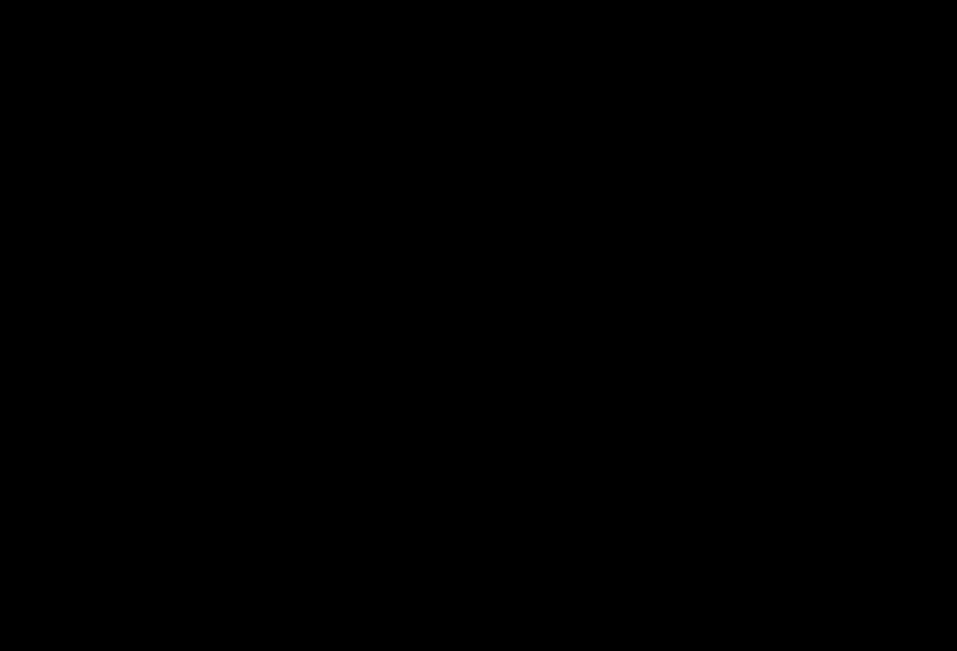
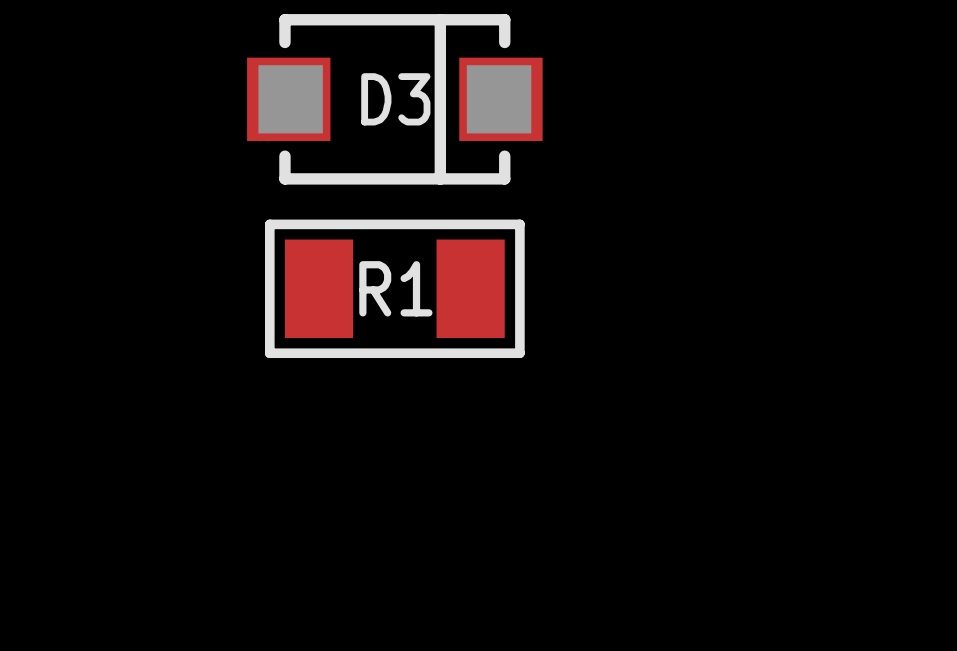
D3: none -> (394, 99)
R1: none -> (394, 288)

